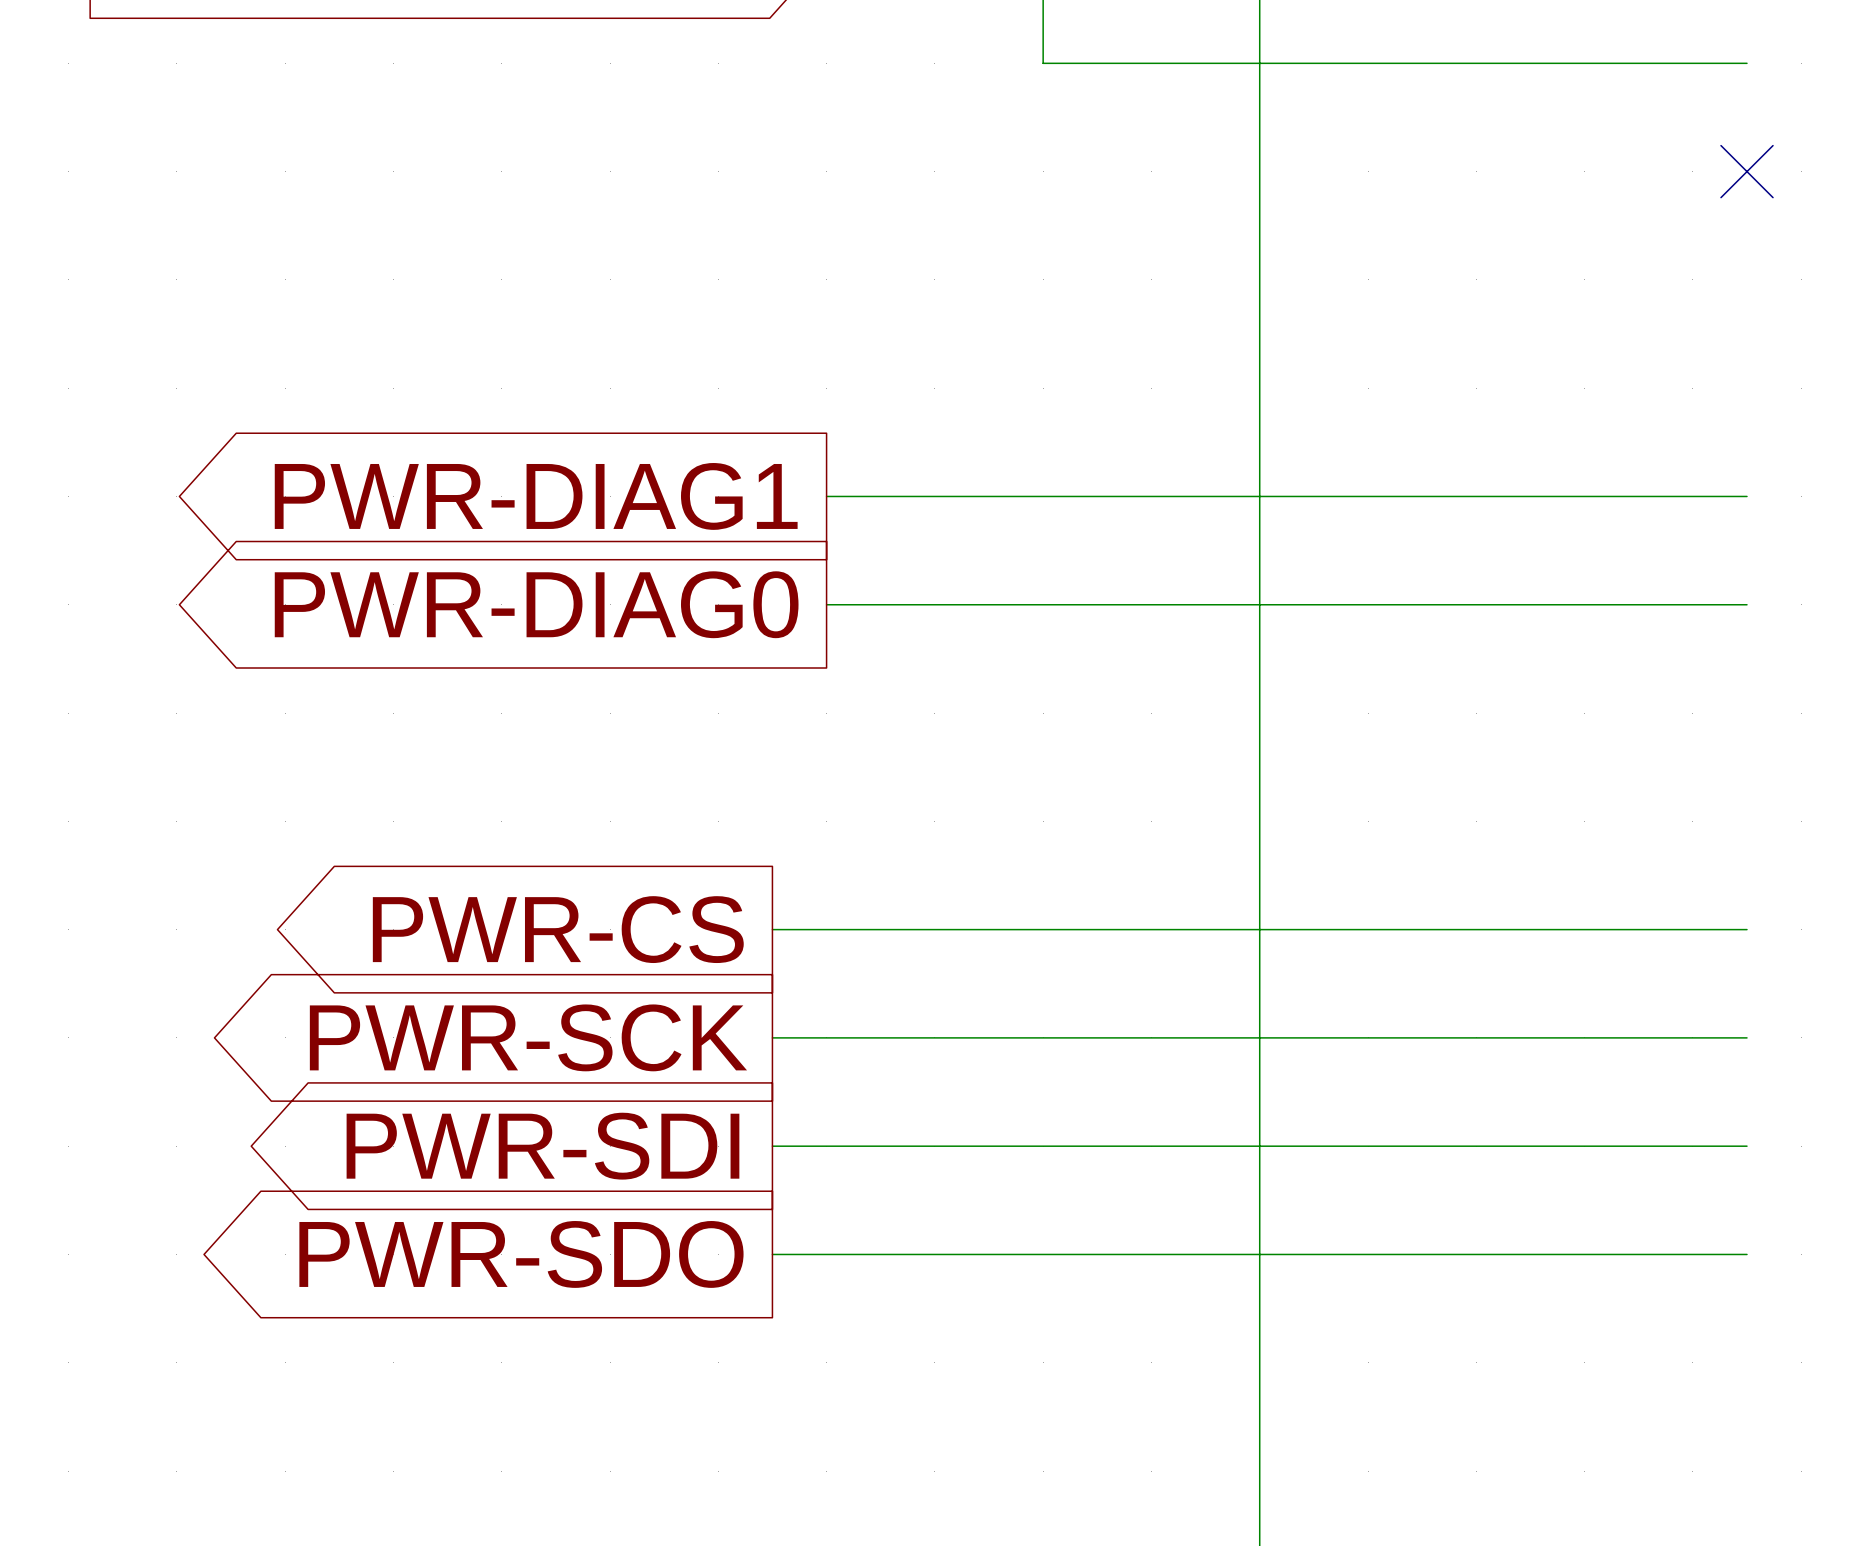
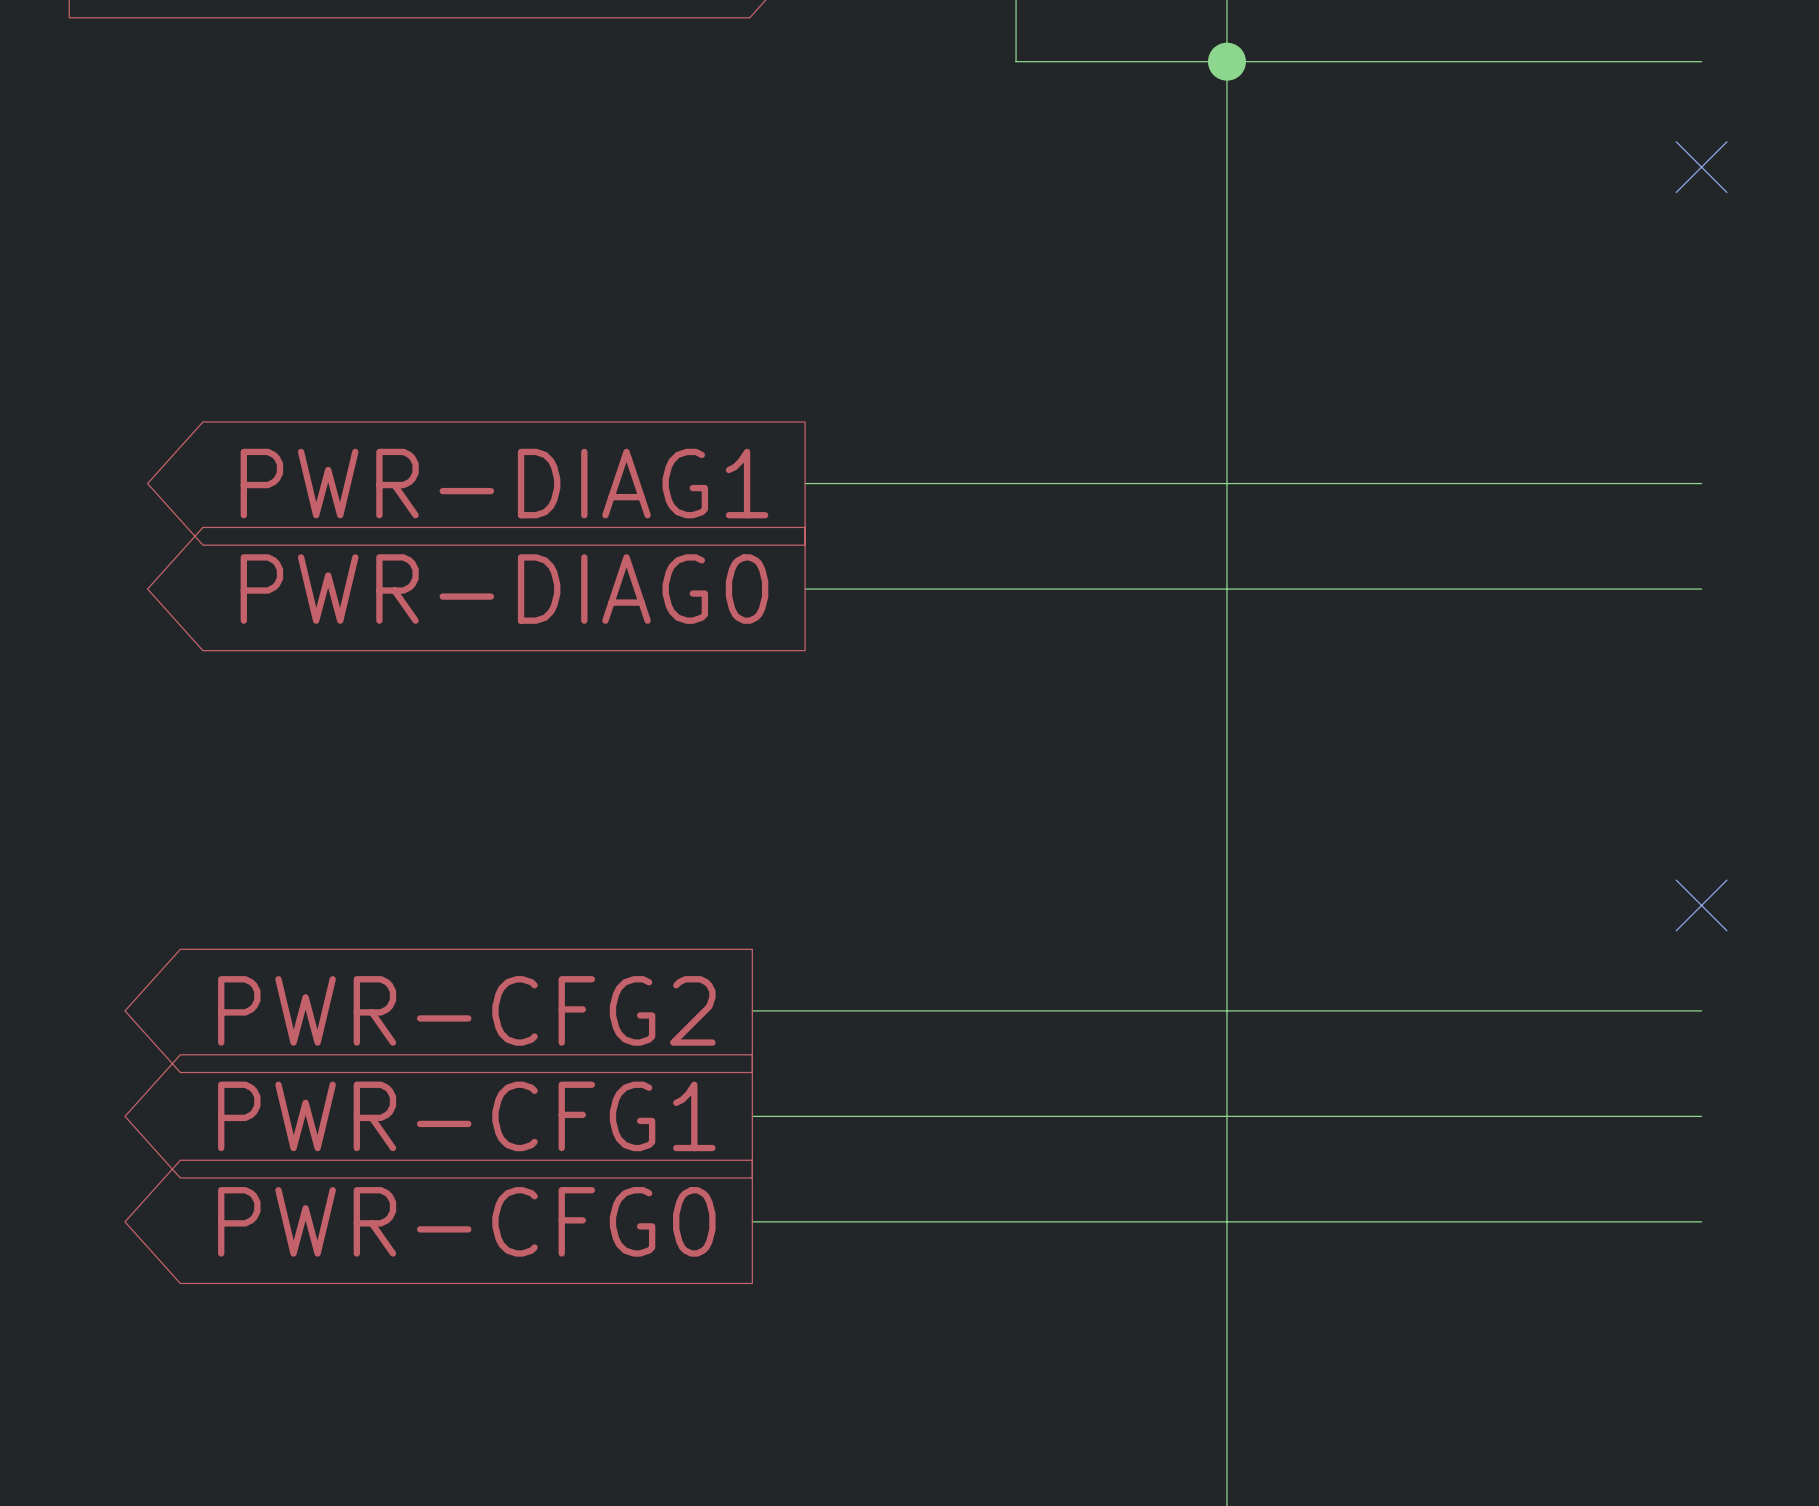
junction: none -> (1226, 61)
global label: PWR-CS (558, 929) -> none
wire: (772, 929) (1747, 929) -> none
no-connect mark: none -> (1701, 905)
global label: PWR-SCK (528, 1037) -> PWR-CFG2 (466, 1010)
global label: PWR-SDI (542, 1146) -> PWR-CFG1 (466, 1116)
global label: PWR-SDO (521, 1254) -> PWR-CFG0 (466, 1221)

